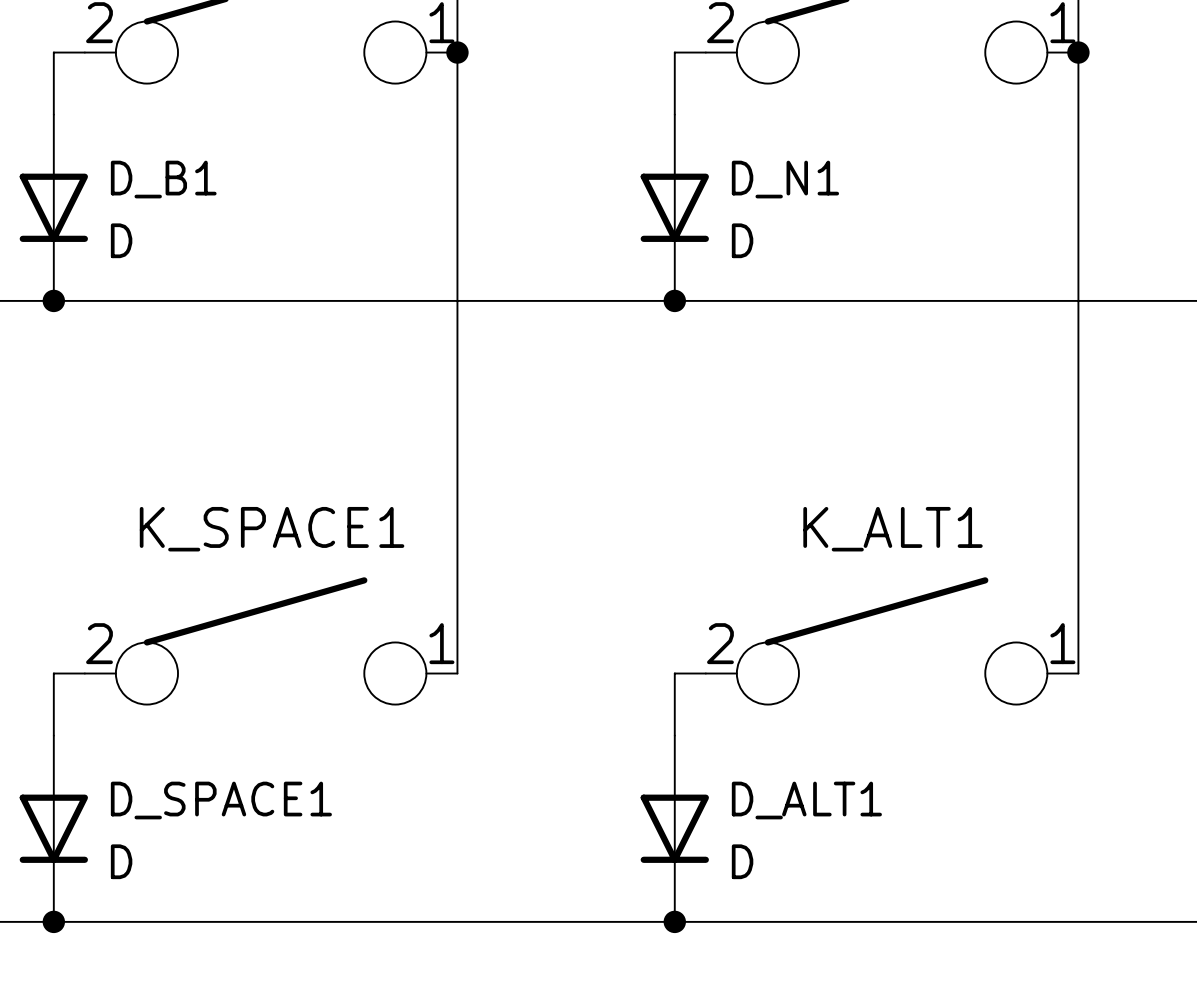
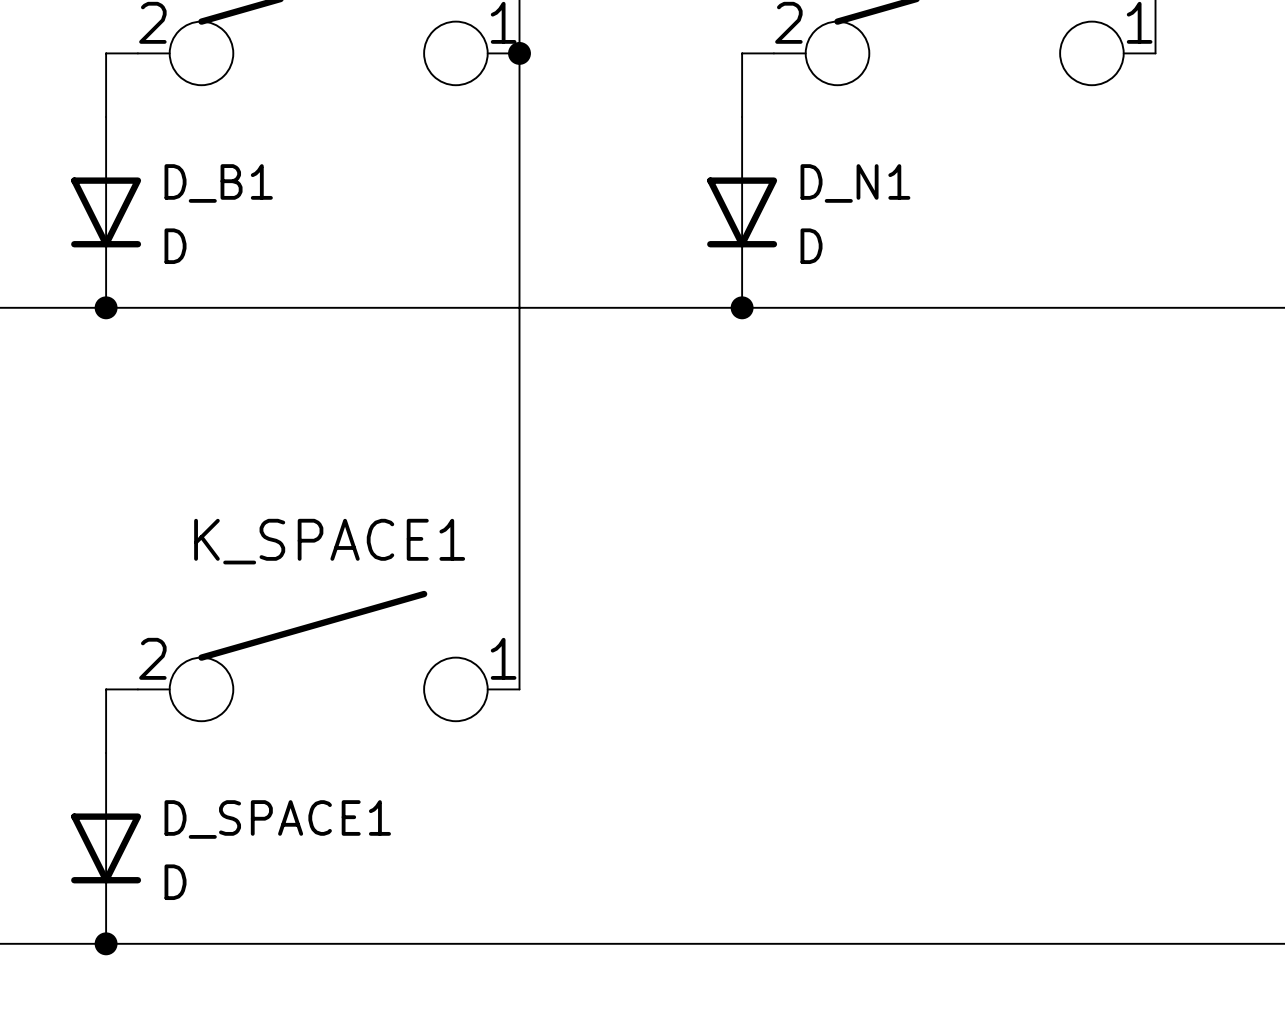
wire: (1078, 52) (1078, 673) -> none
junction: (1078, 52) -> none
K_ALT1: (892, 640) -> none
wire: (705, 673) (674, 673) (674, 735) -> none
D_ALT1: D (674, 828) -> none
junction: (674, 921) -> none

